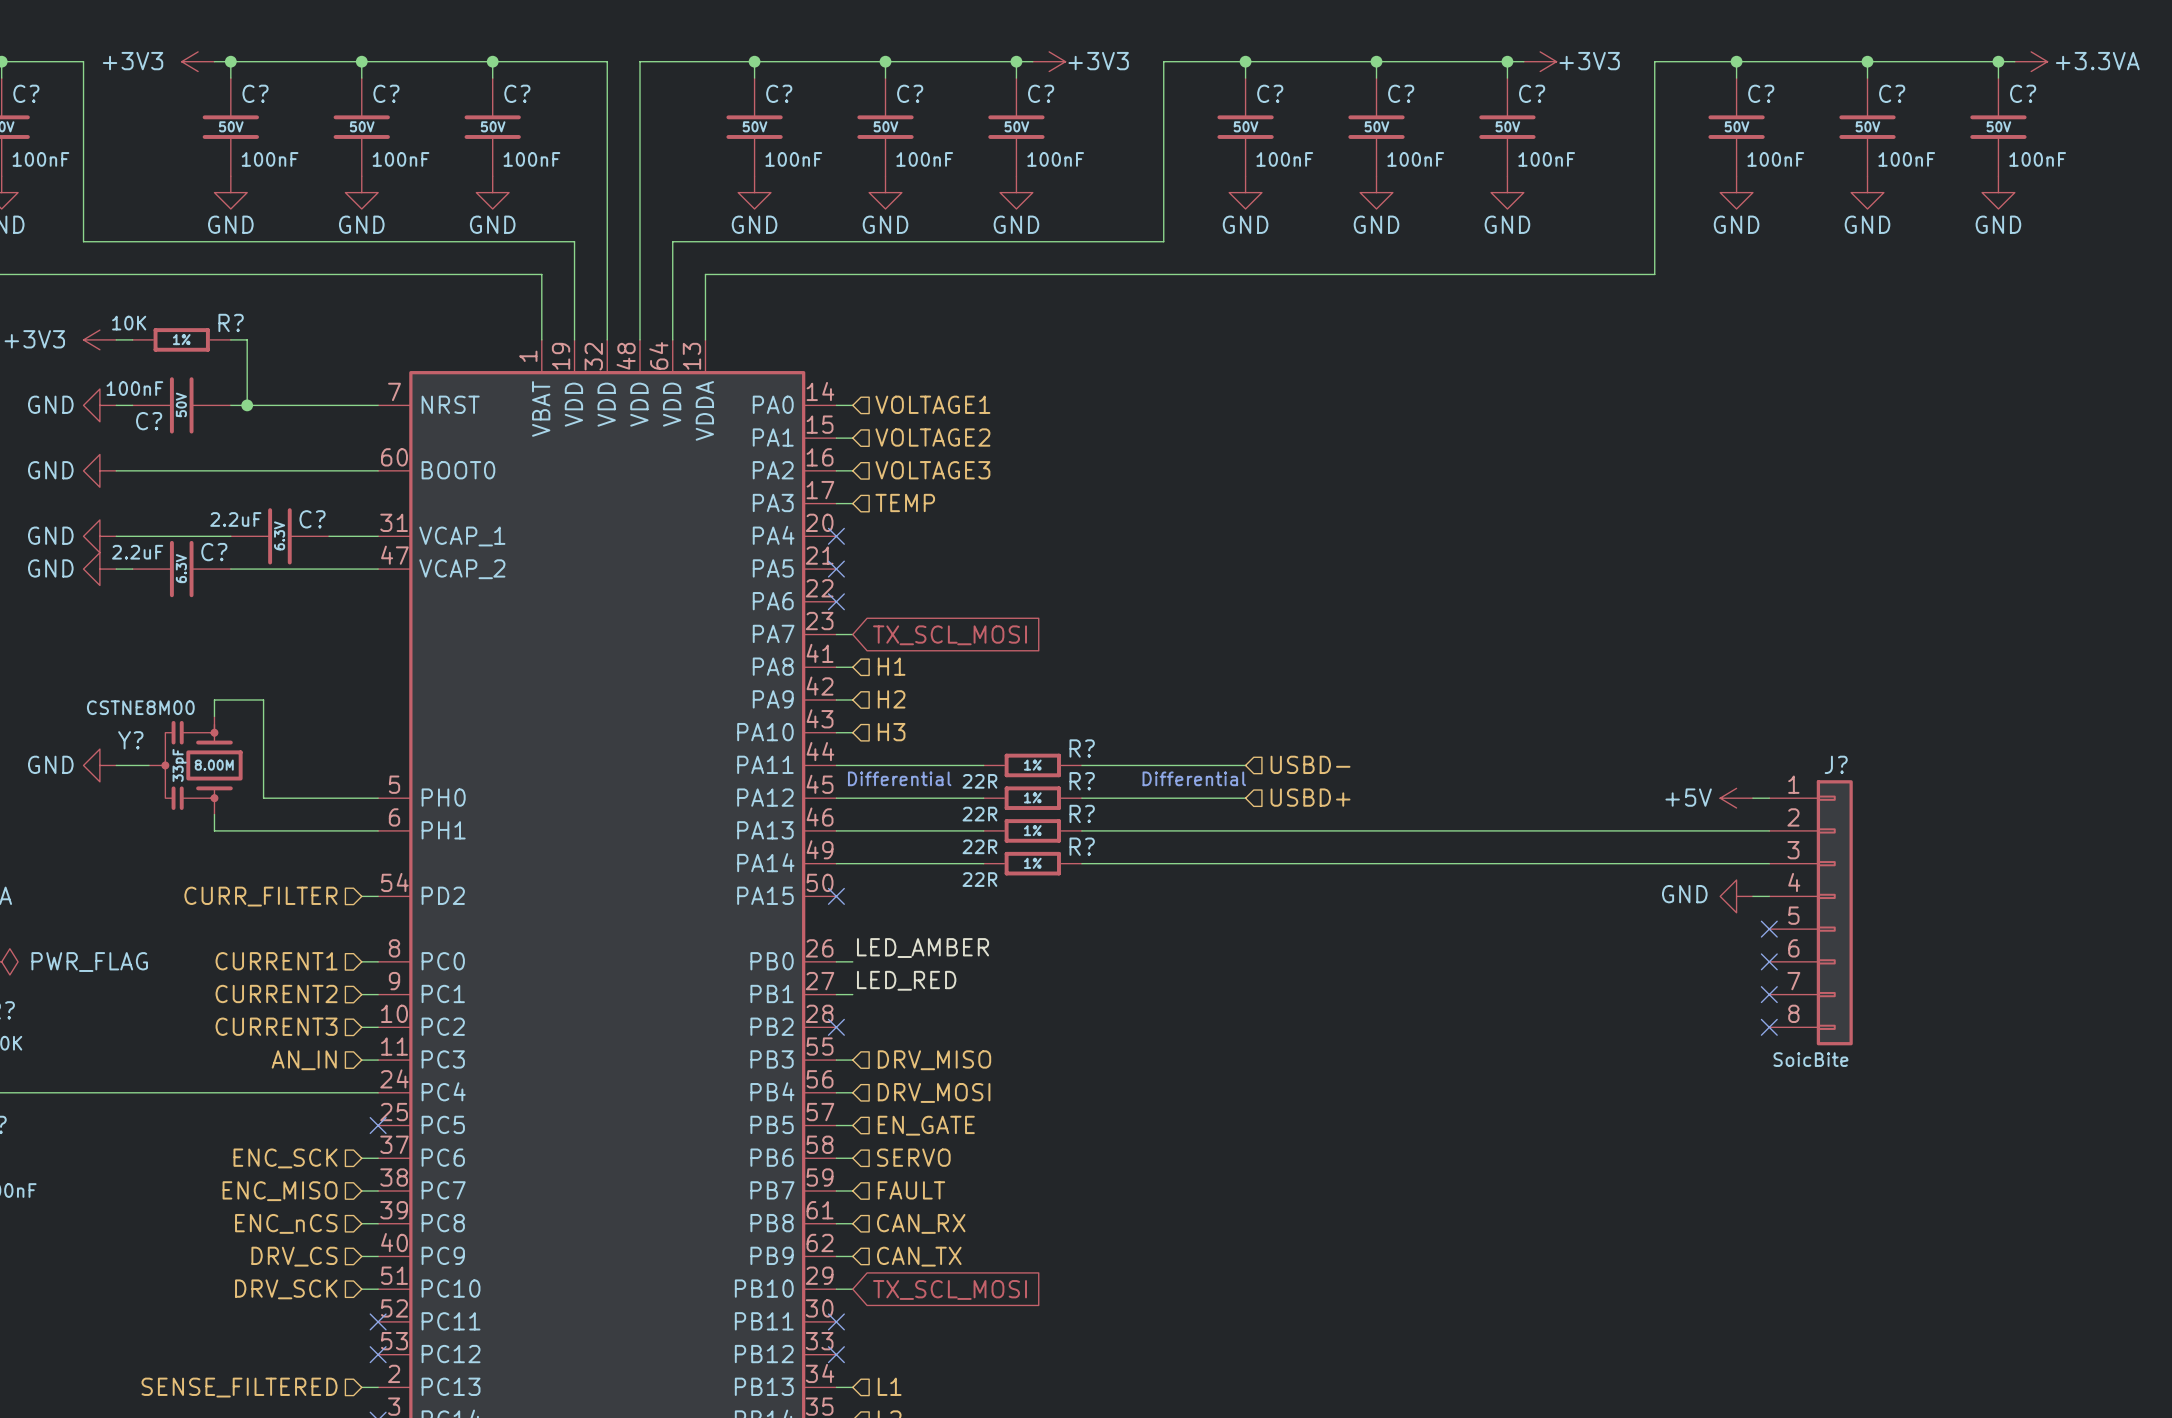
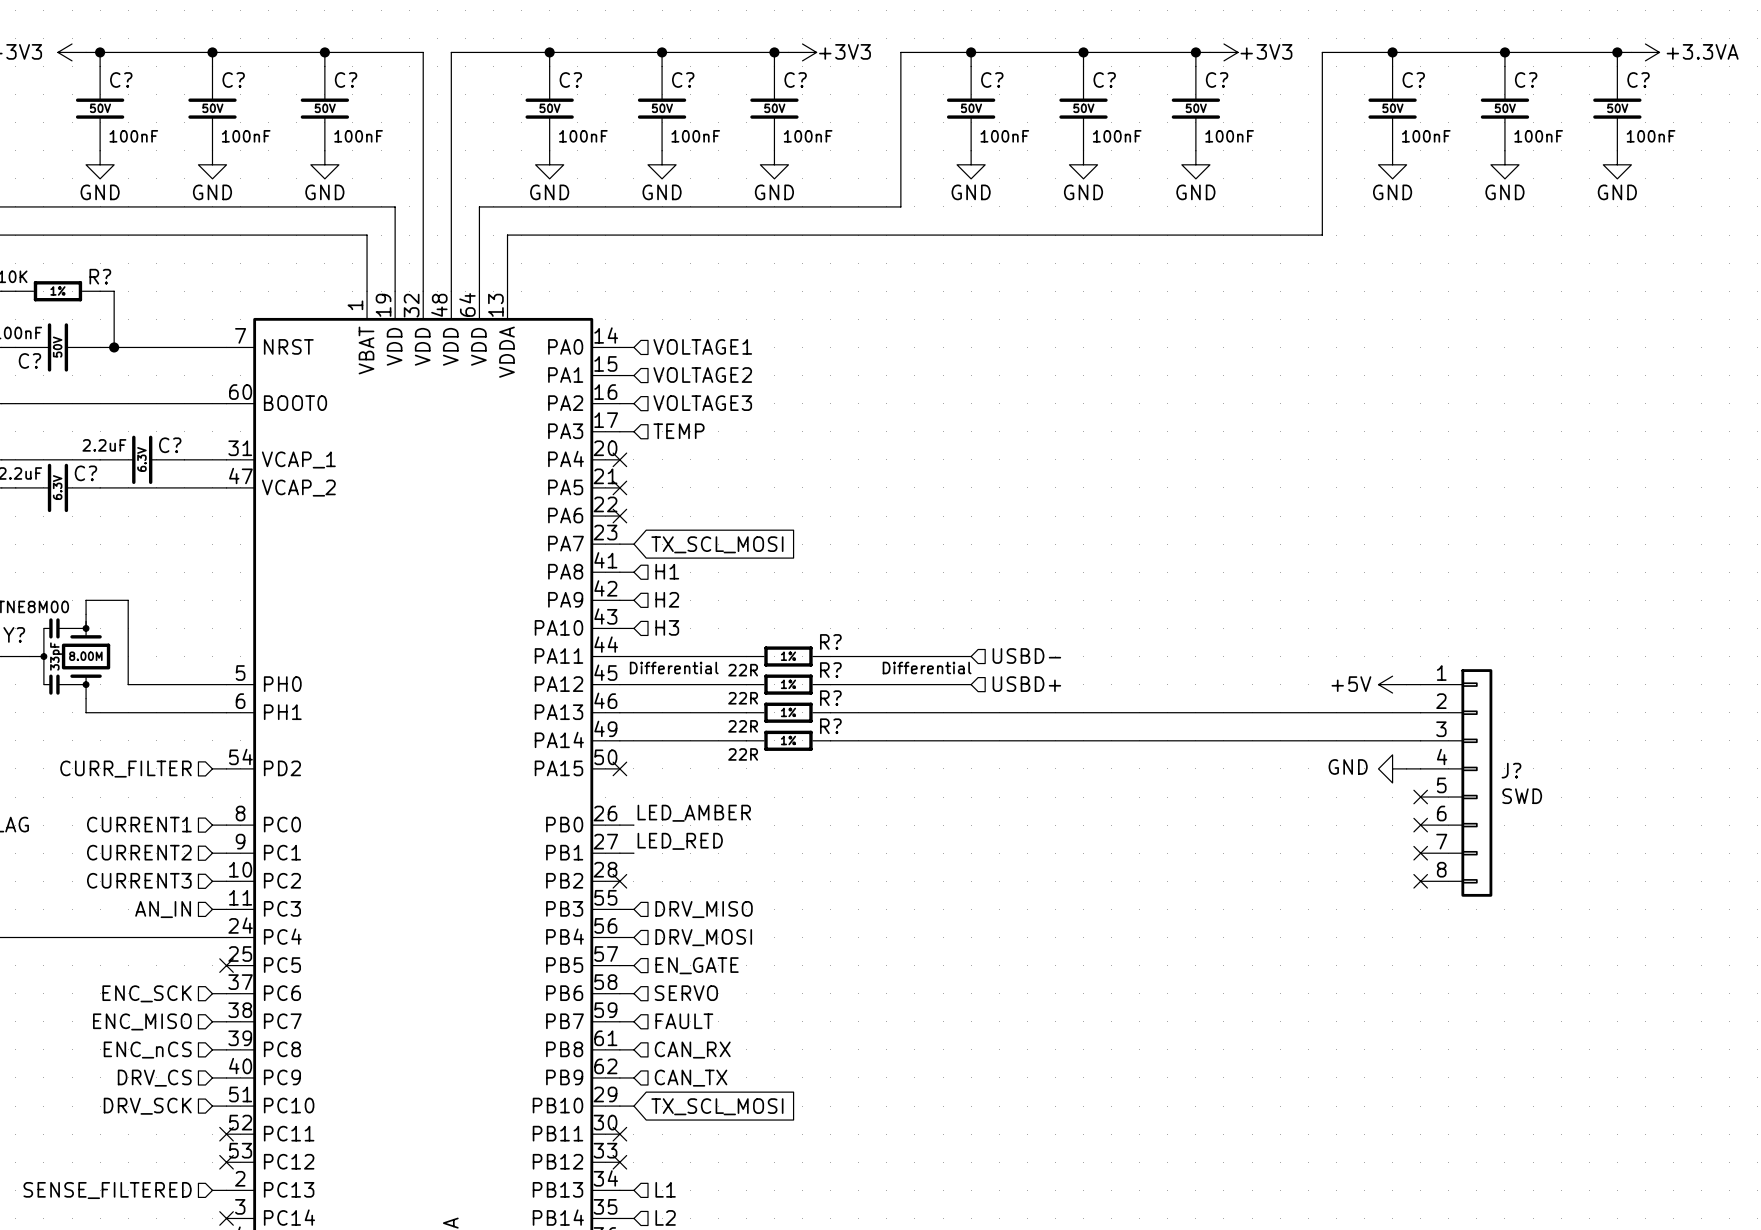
J? name position: J? (1836, 764) -> J? (1511, 770)
J? value: SoicBite (1810, 1059) -> SWD (1522, 796)

